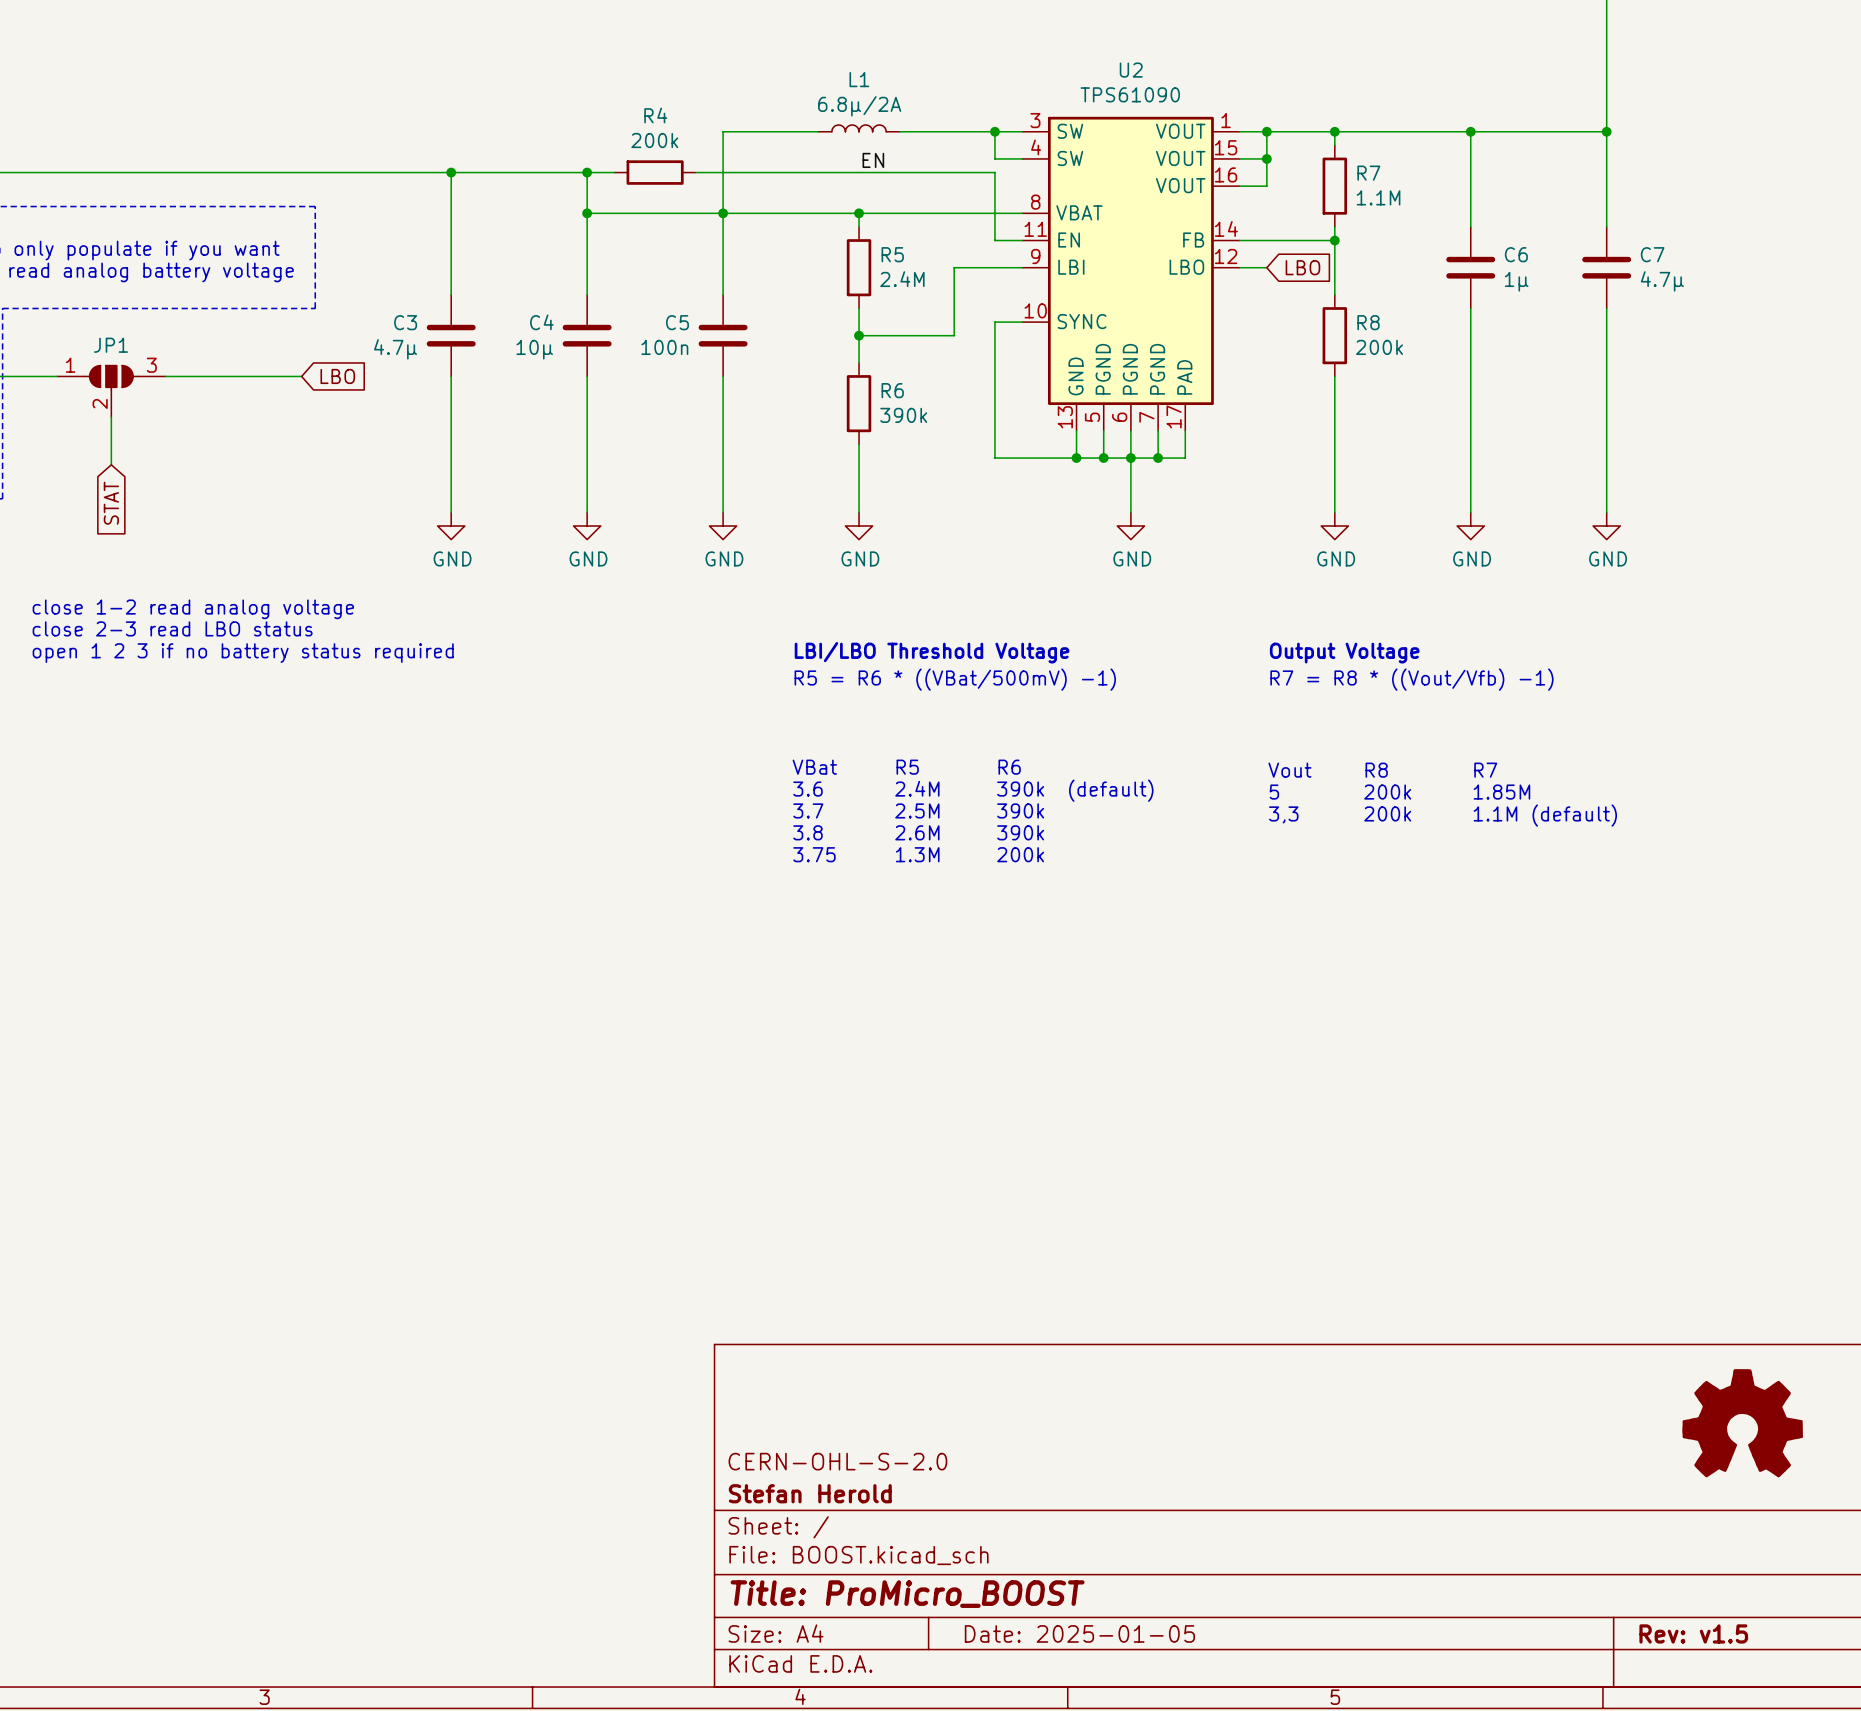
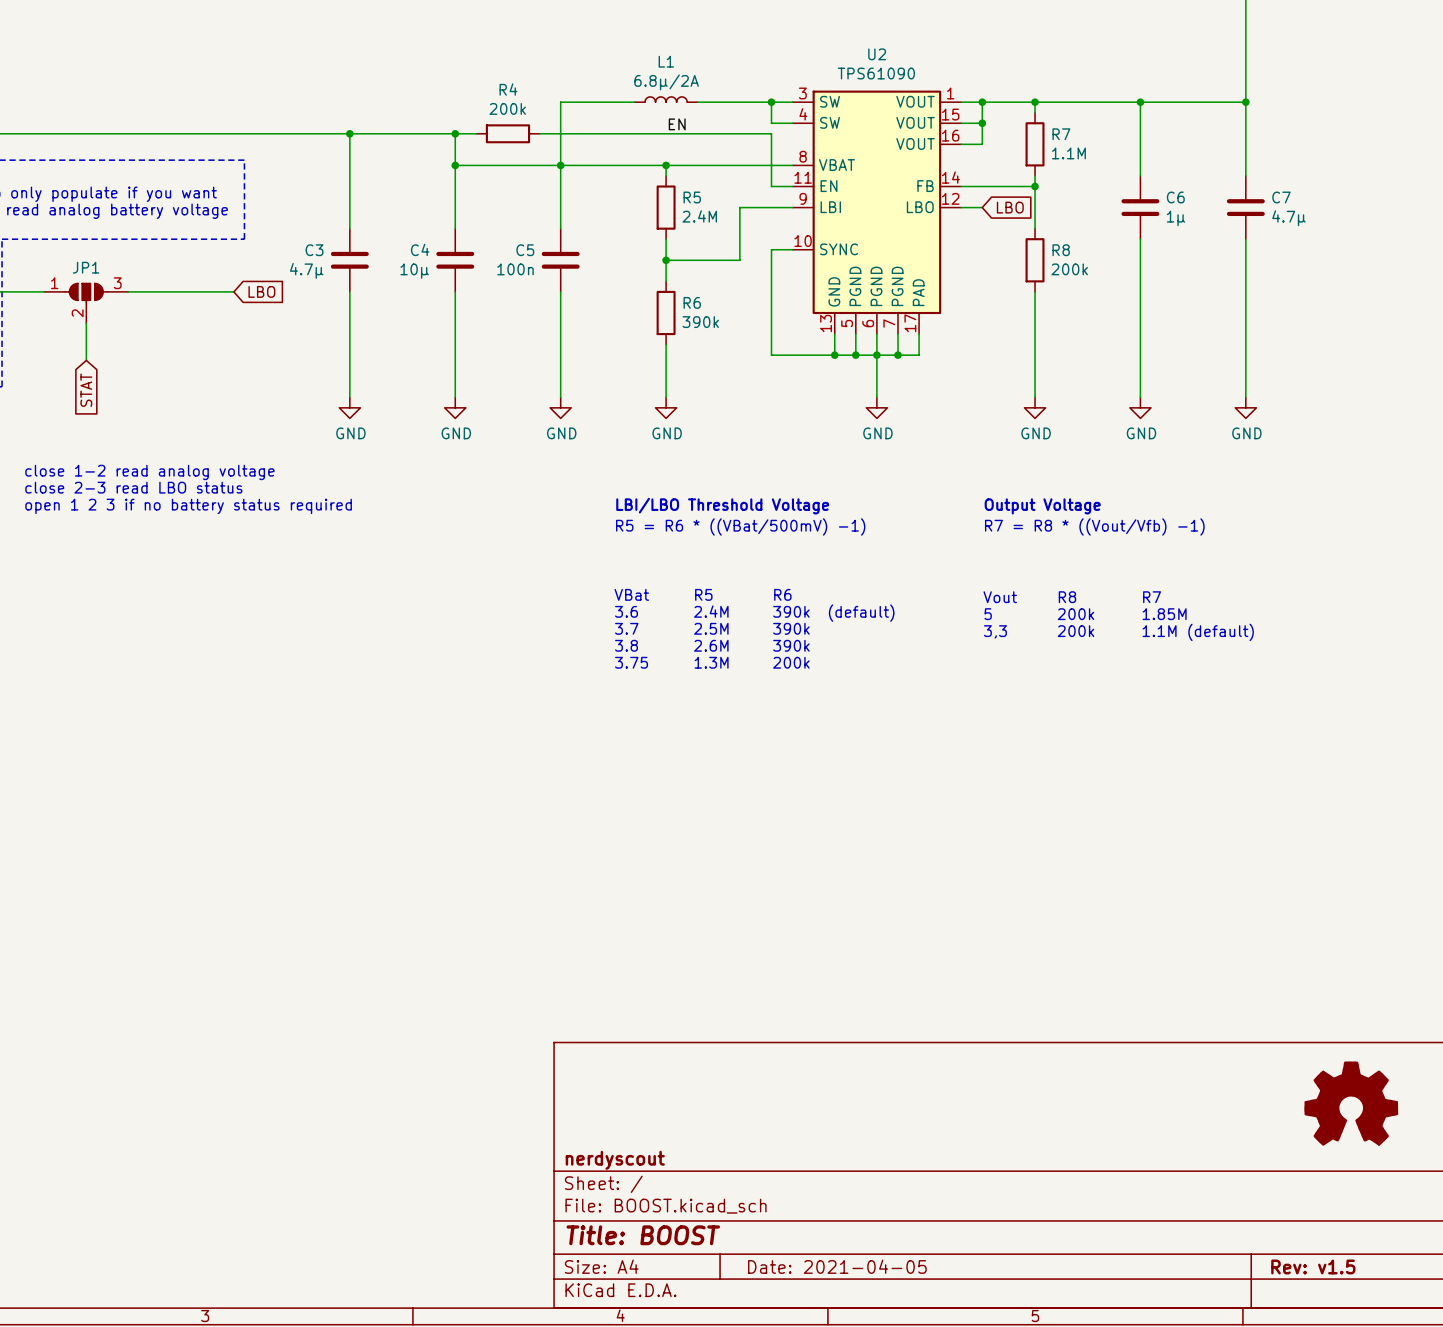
title block: CERN-OHL-S-2.0 (837, 1461) -> none
title block: Stefan Herold (810, 1493) -> nerdyscout (615, 1160)
title block: Title: ProMicro_BOOST (907, 1594) -> Title: BOOST (643, 1235)
title block: Date: 2025-01-05 (1079, 1633) -> Date: 2021-04-05 (837, 1266)

